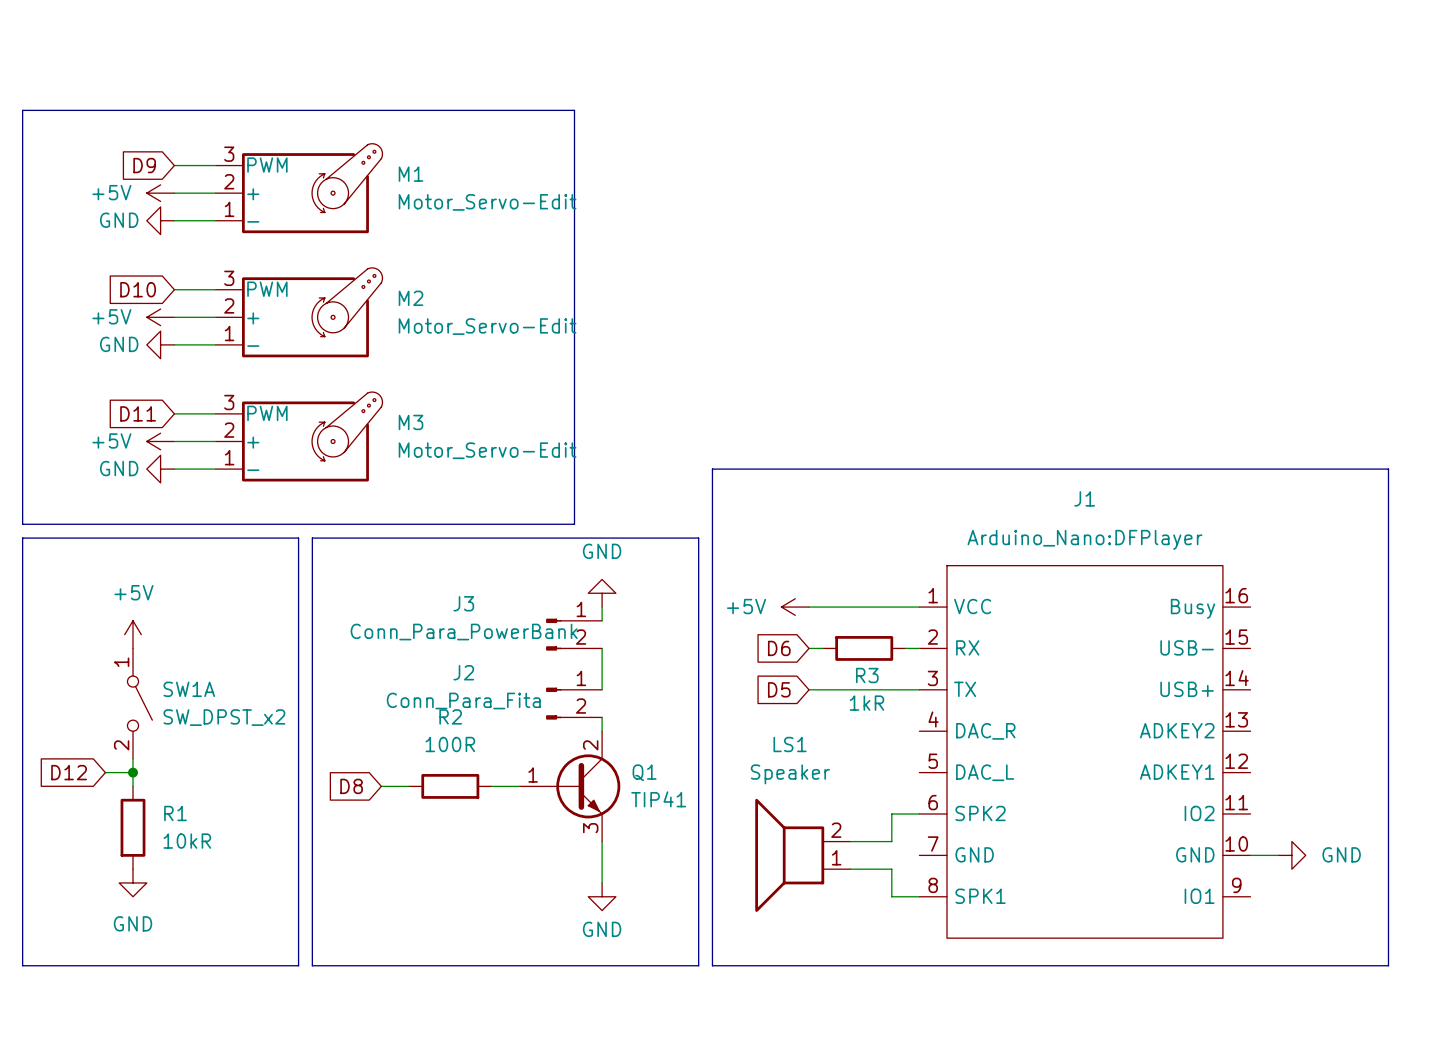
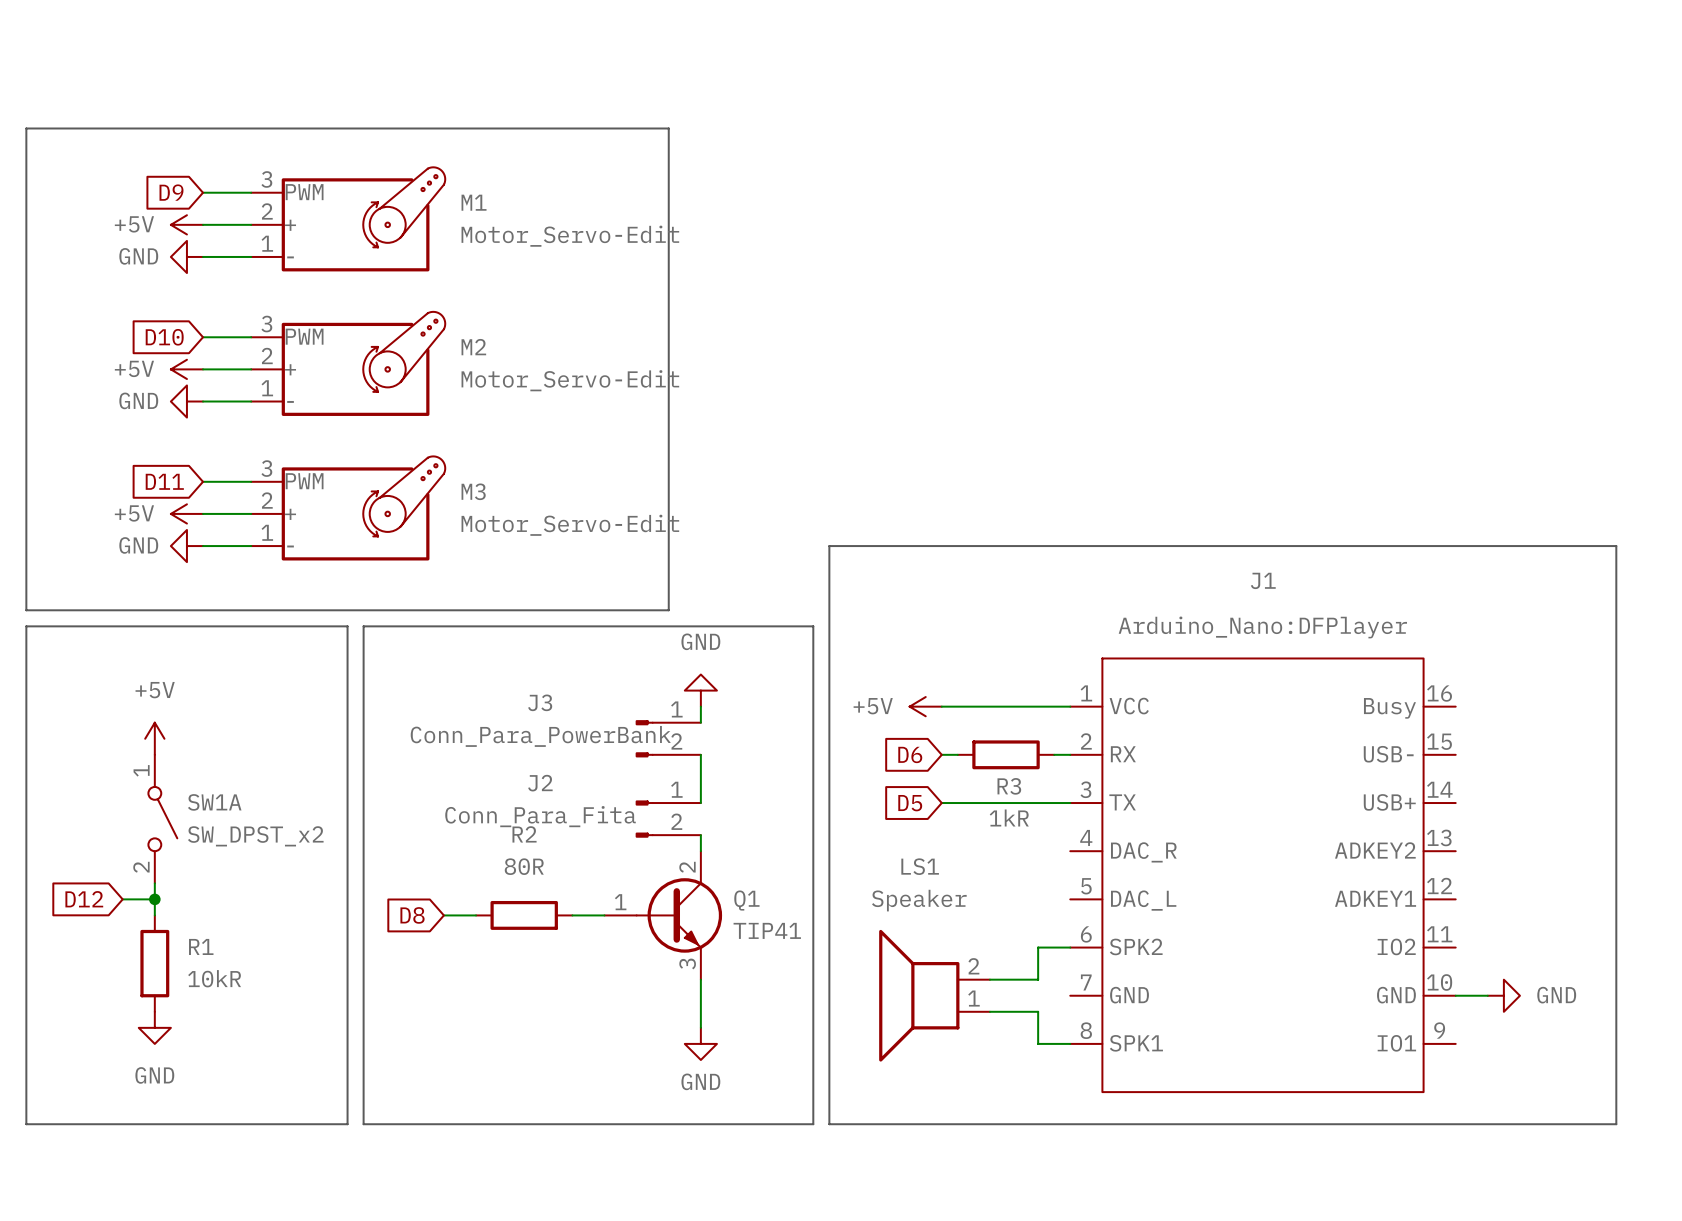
R2 value: 100R (450, 744) -> 80R (524, 866)

